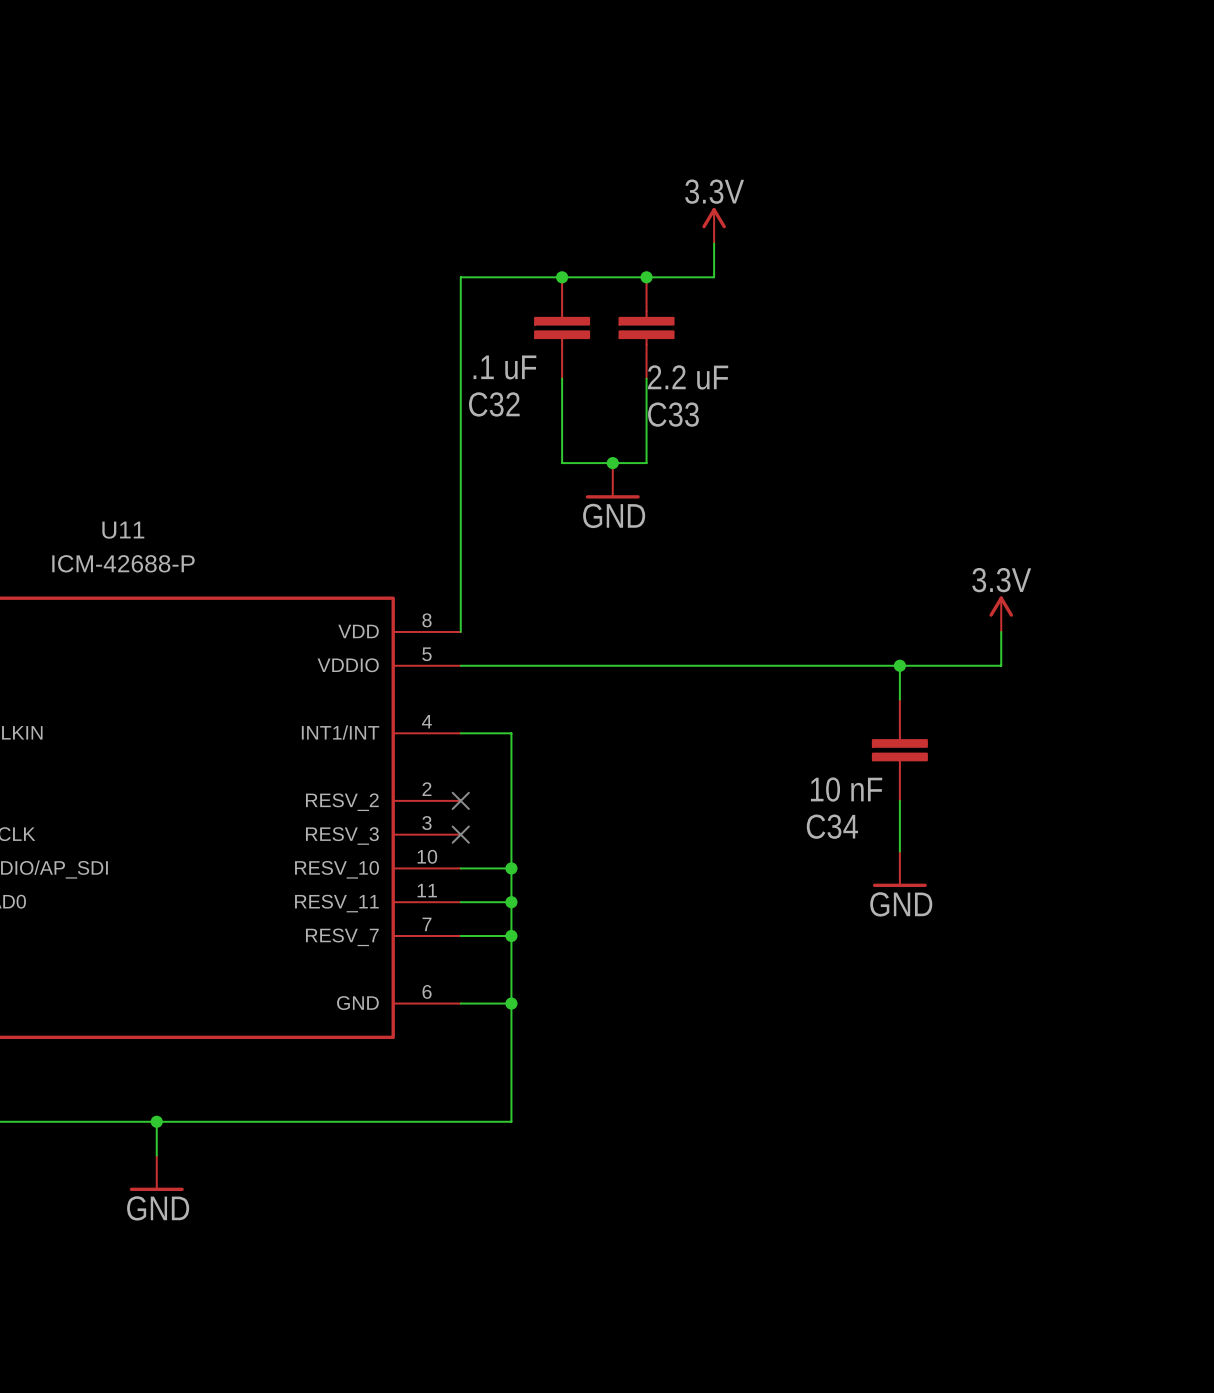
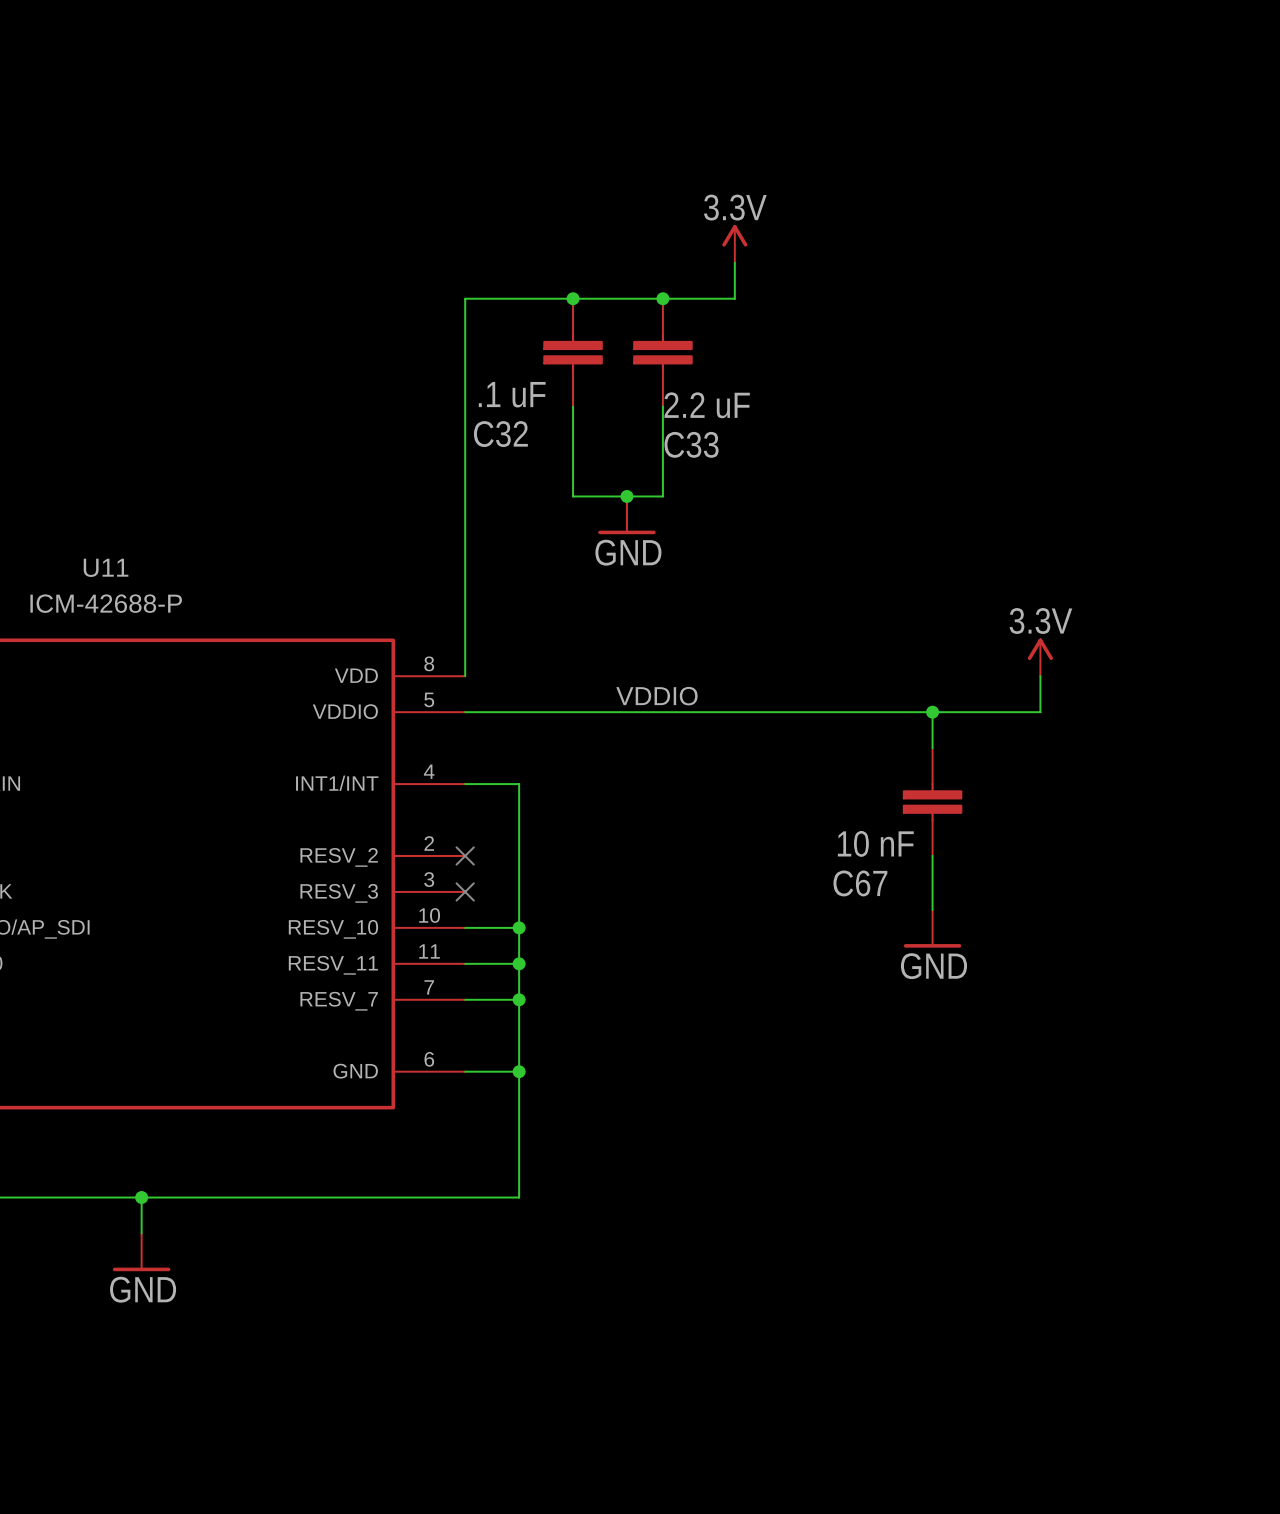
label: none -> VDDIO (656, 696)
C34 name: C34 (832, 826) -> C67 (860, 883)

